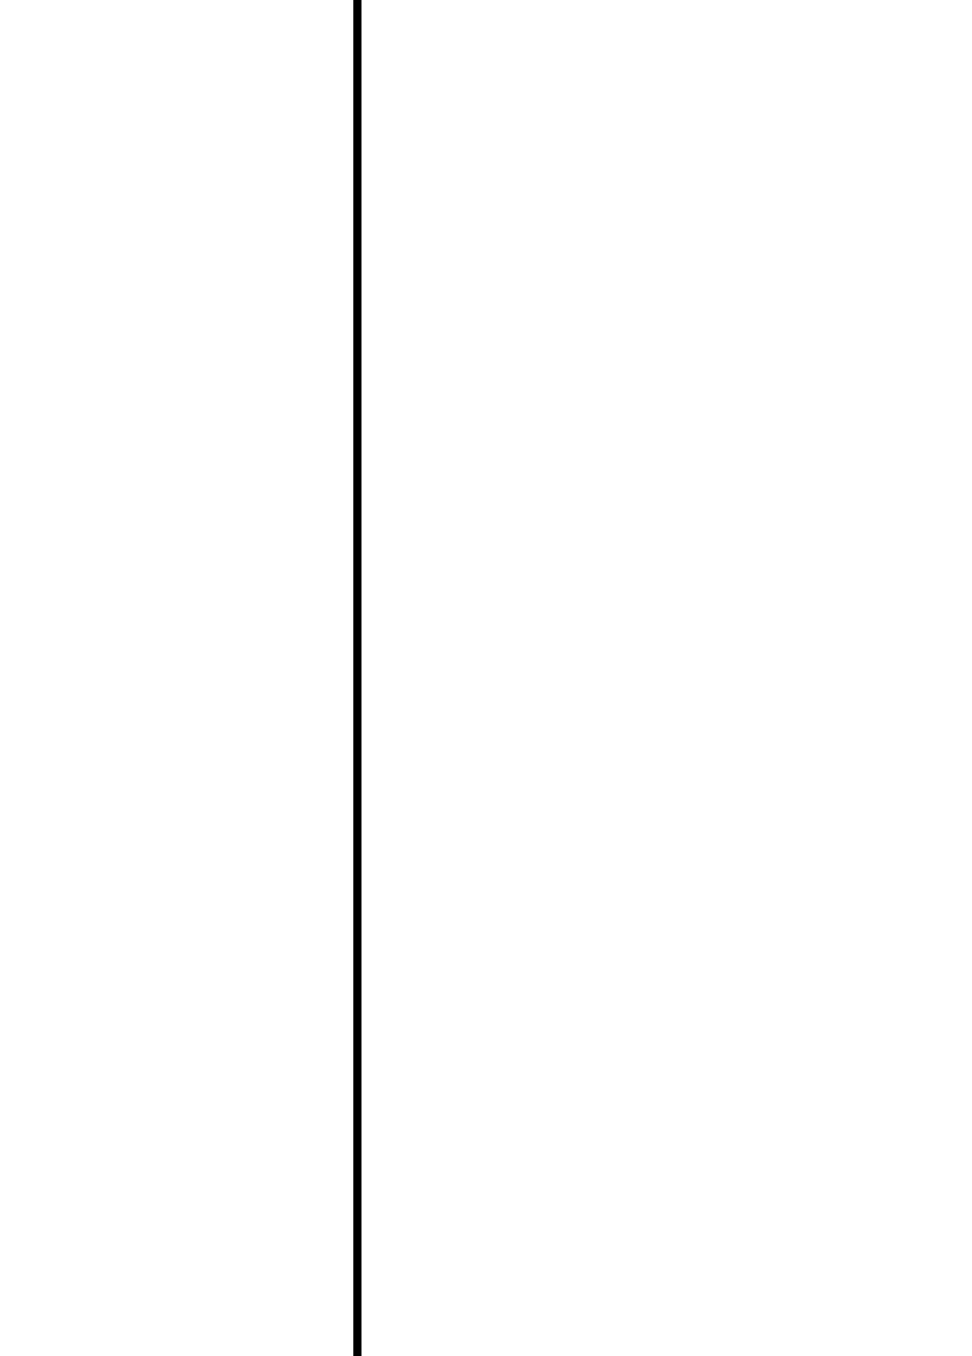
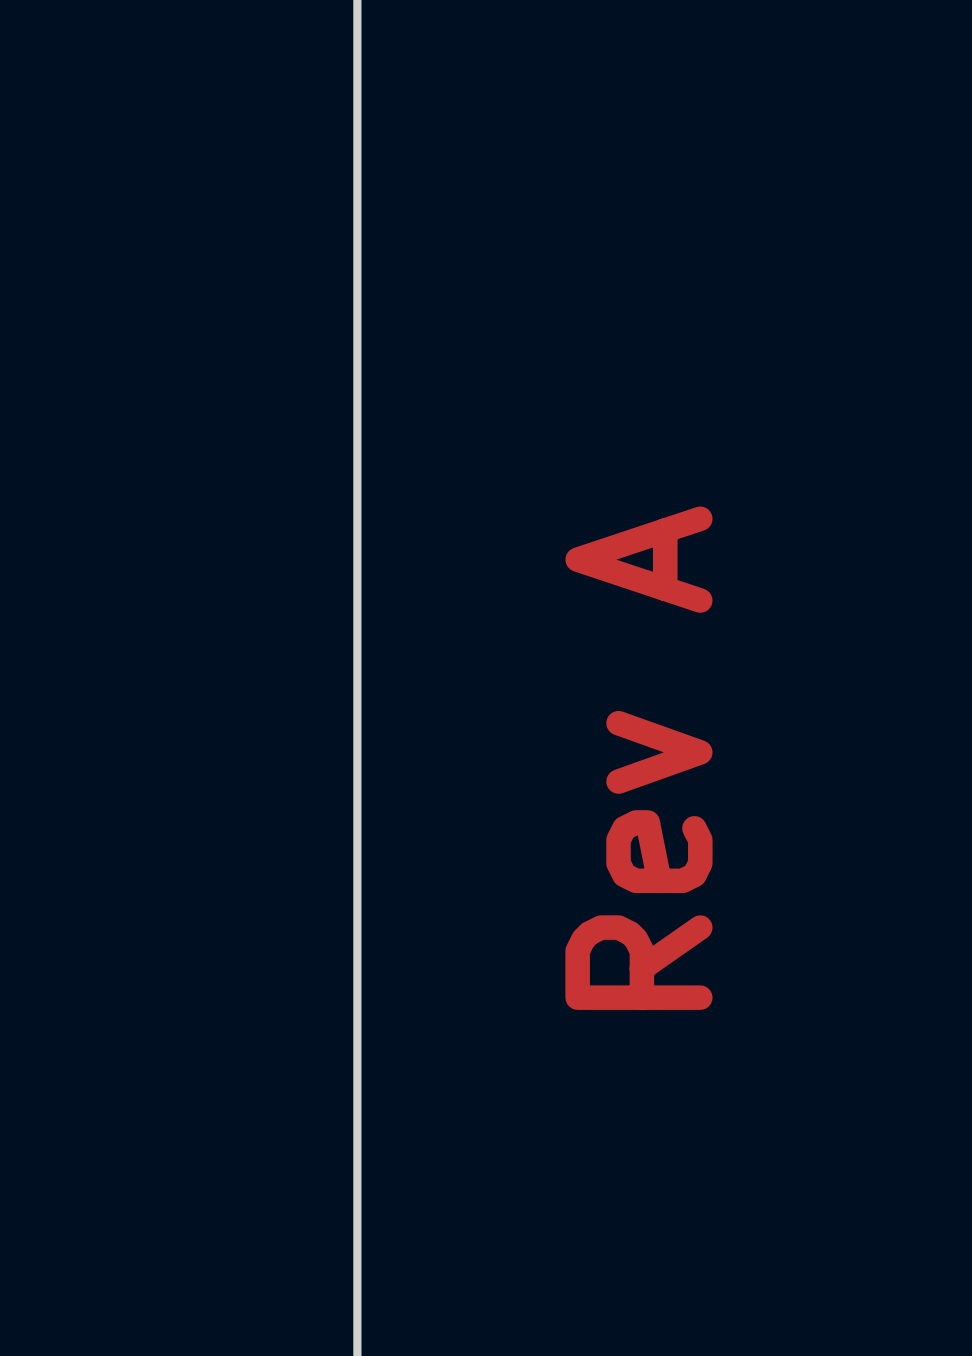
text: none -> Rev A (638, 758)

